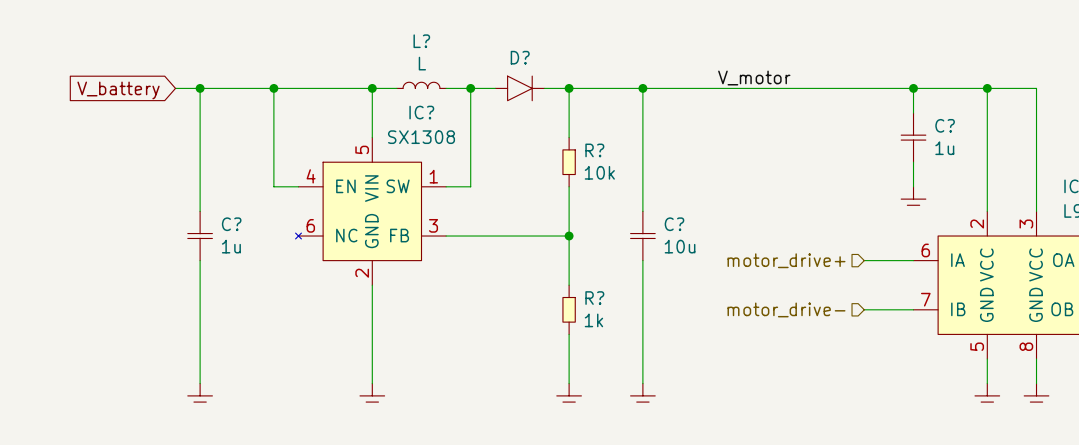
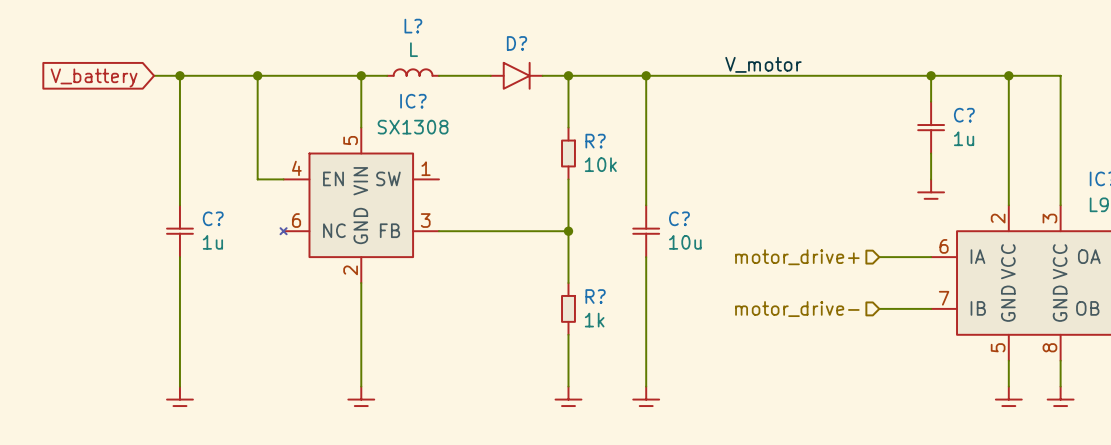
wire: (470, 88) (470, 186) (446, 186) -> none
junction: (470, 88) -> none

